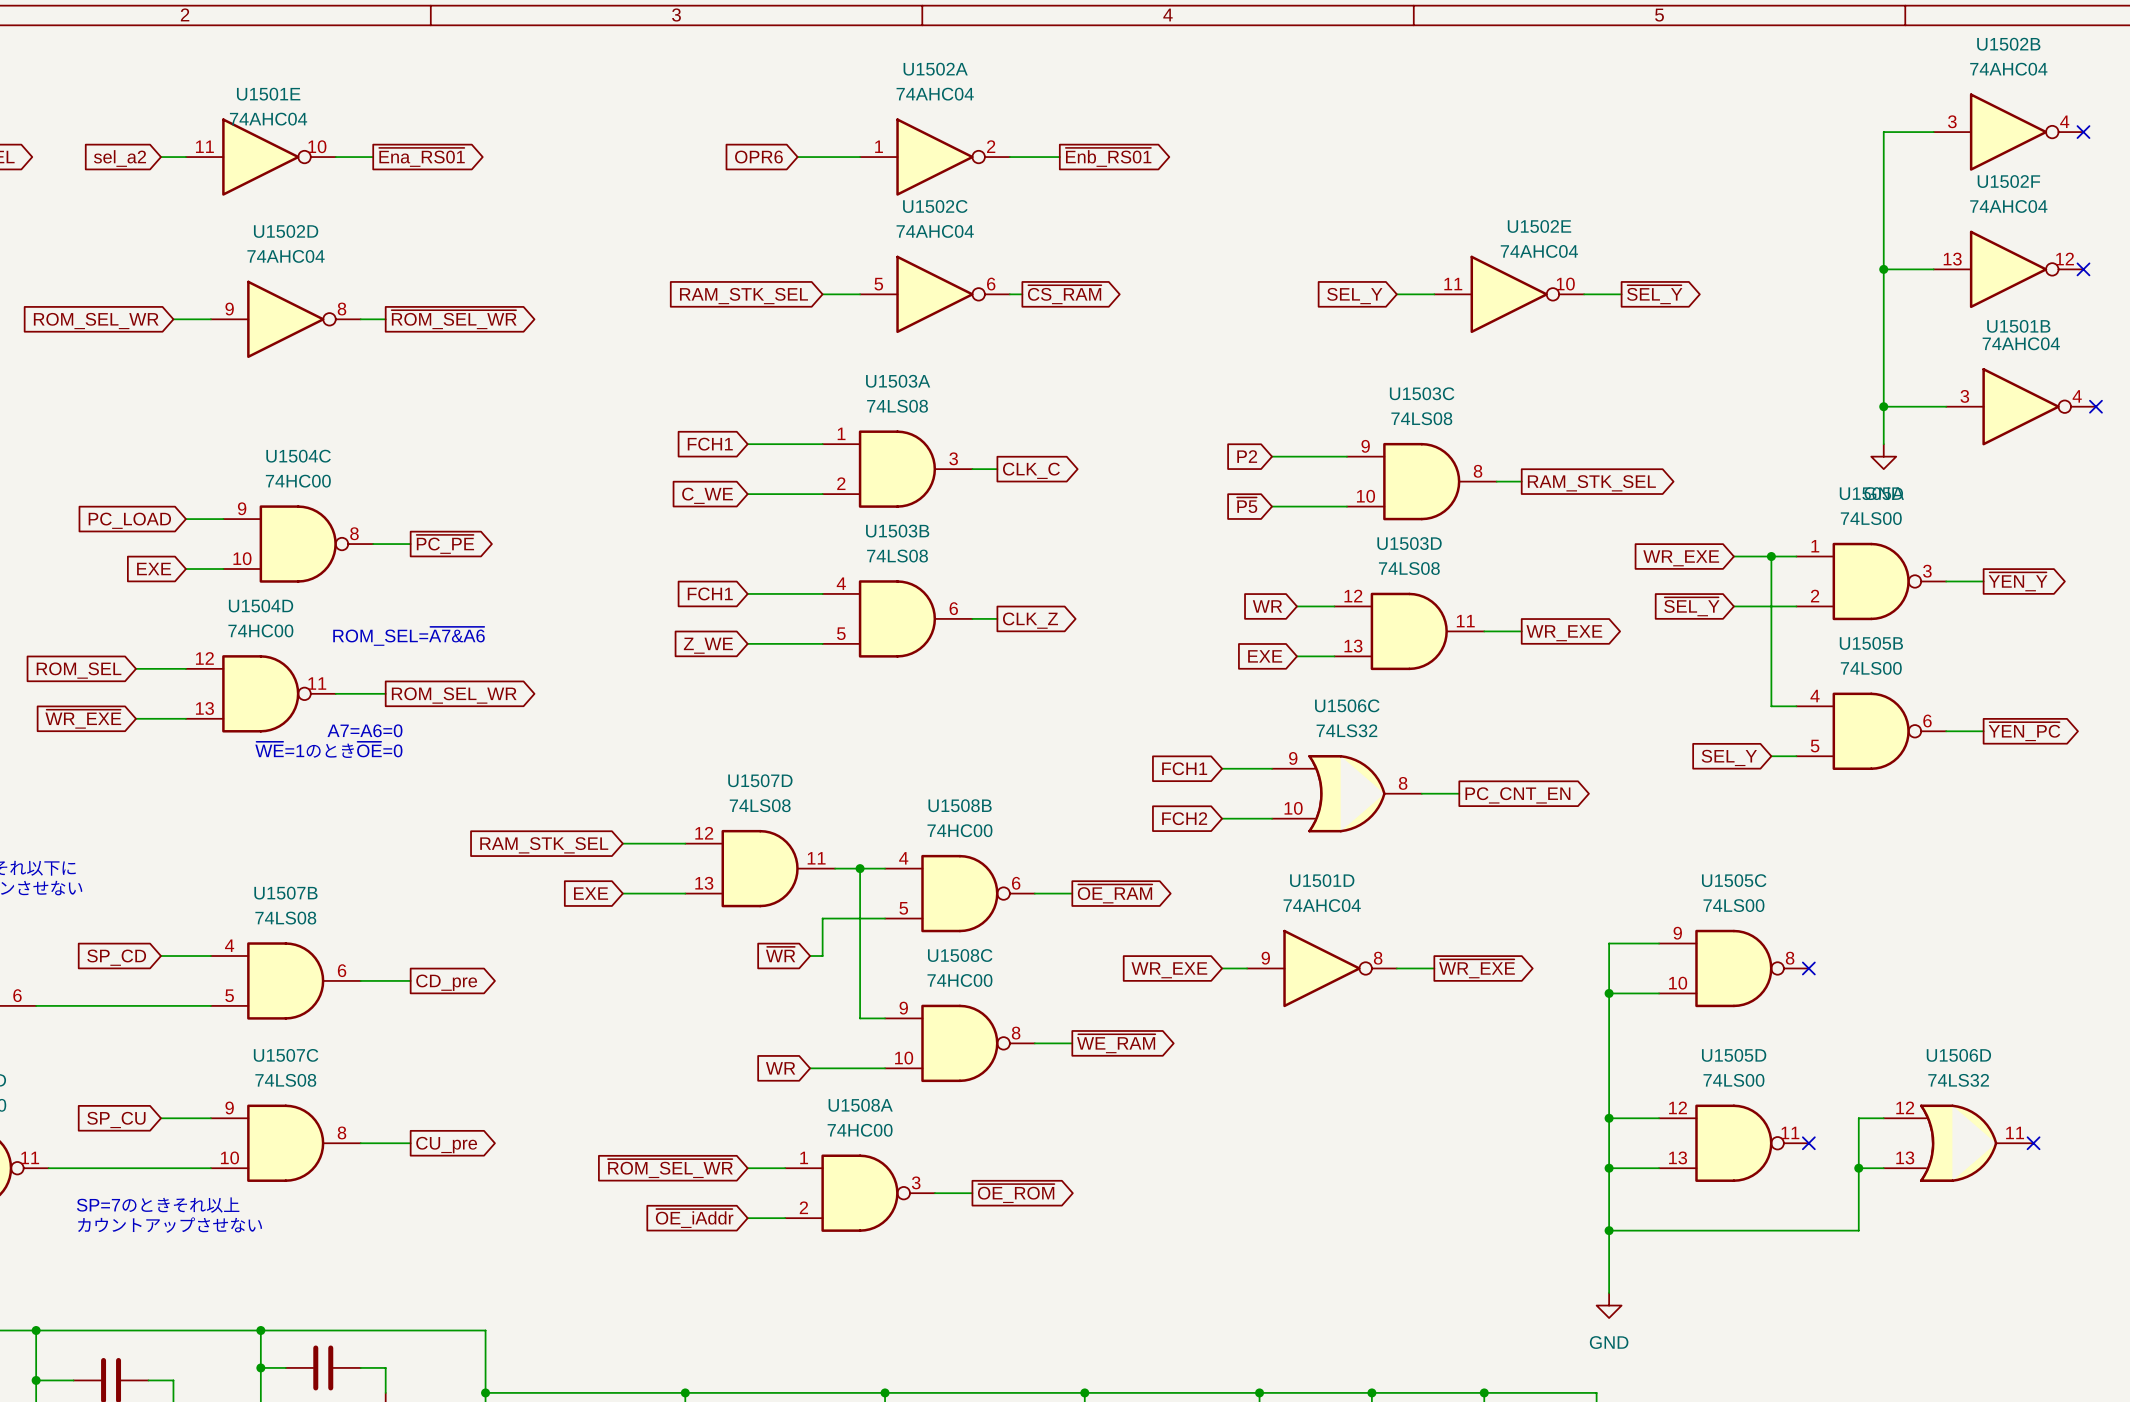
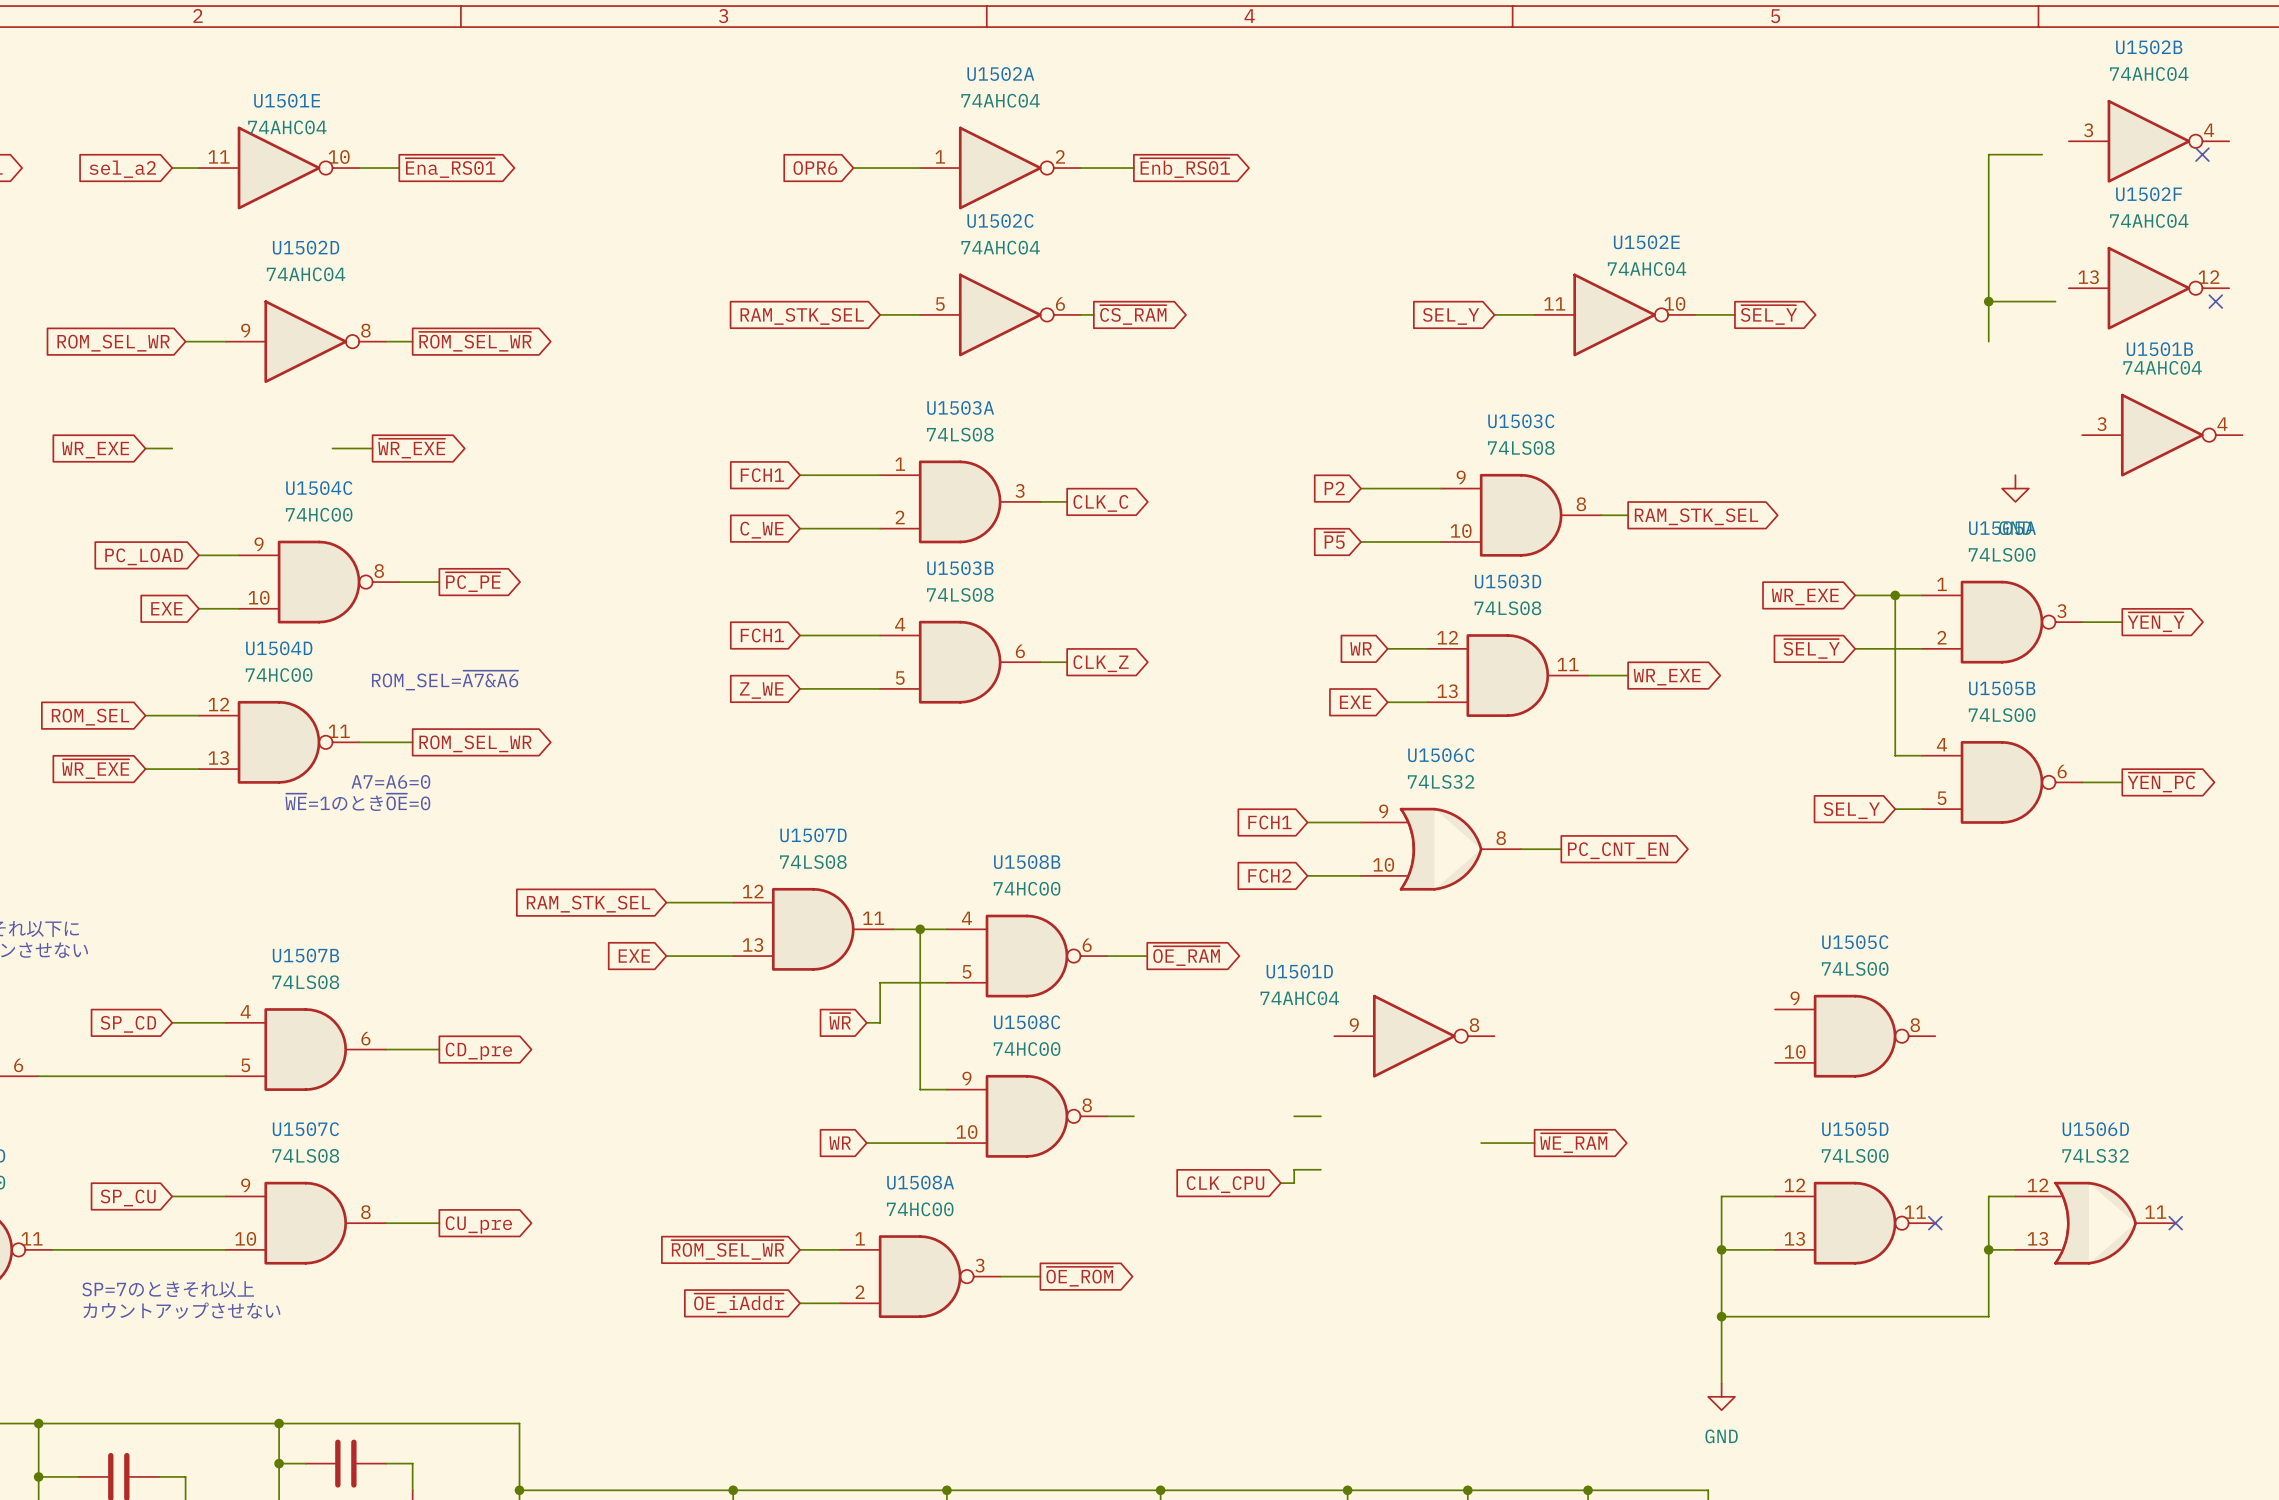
wire: (1933, 132) (1883, 132) (1883, 444) -> none
no-connect mark position: (2083, 132) -> (2202, 154)
wire: none -> (2042, 154) (1988, 154) (1988, 341)
wire: (1883, 269) (1933, 269) -> none
junction position: (1883, 269) -> (1988, 301)
no-connect mark position: (2083, 269) -> (2215, 301)
wire: (1883, 406) (1946, 406) -> (1988, 301) (2055, 301)
junction: (1883, 406) -> none
no-connect mark: (2095, 406) -> none
wire: none -> (145, 448) (172, 448)
wire: none -> (332, 448) (372, 448)
global label: none -> ~{WR_EXE} (411, 448)
global label: none -> WR_EXE (95, 450)
U1501D name position: U1501D (1322, 880) -> U1501D (1299, 971)
U1501D value position: 74AHC04 (1322, 905) -> 74AHC04 (1299, 998)
wire: (1659, 943) (1609, 943) (1609, 1118) -> none
wire: (1222, 968) (1247, 968) -> (1294, 1116) (1320, 1116)
wire: (1396, 968) (1434, 968) -> none
global label: ~{WR_EXE} (1476, 968) -> none
no-connect mark: (1808, 968) -> none
global label: WR_EXE (1169, 970) -> none
wire: (1609, 993) (1659, 993) -> (1481, 1143) (1534, 1143)
junction: (1609, 993) -> none
wire: (1059, 1043) (1072, 1043) -> none
global label: ~{WE_RAM} (1116, 1043) -> none
global label: none -> ~{WE_RAM} (1573, 1143)
wire: none -> (1320, 1169) (1294, 1169) (1294, 1183) (1280, 1183)
global label: none -> CLK_CPU (1225, 1184)
junction: (1609, 1118) -> none

